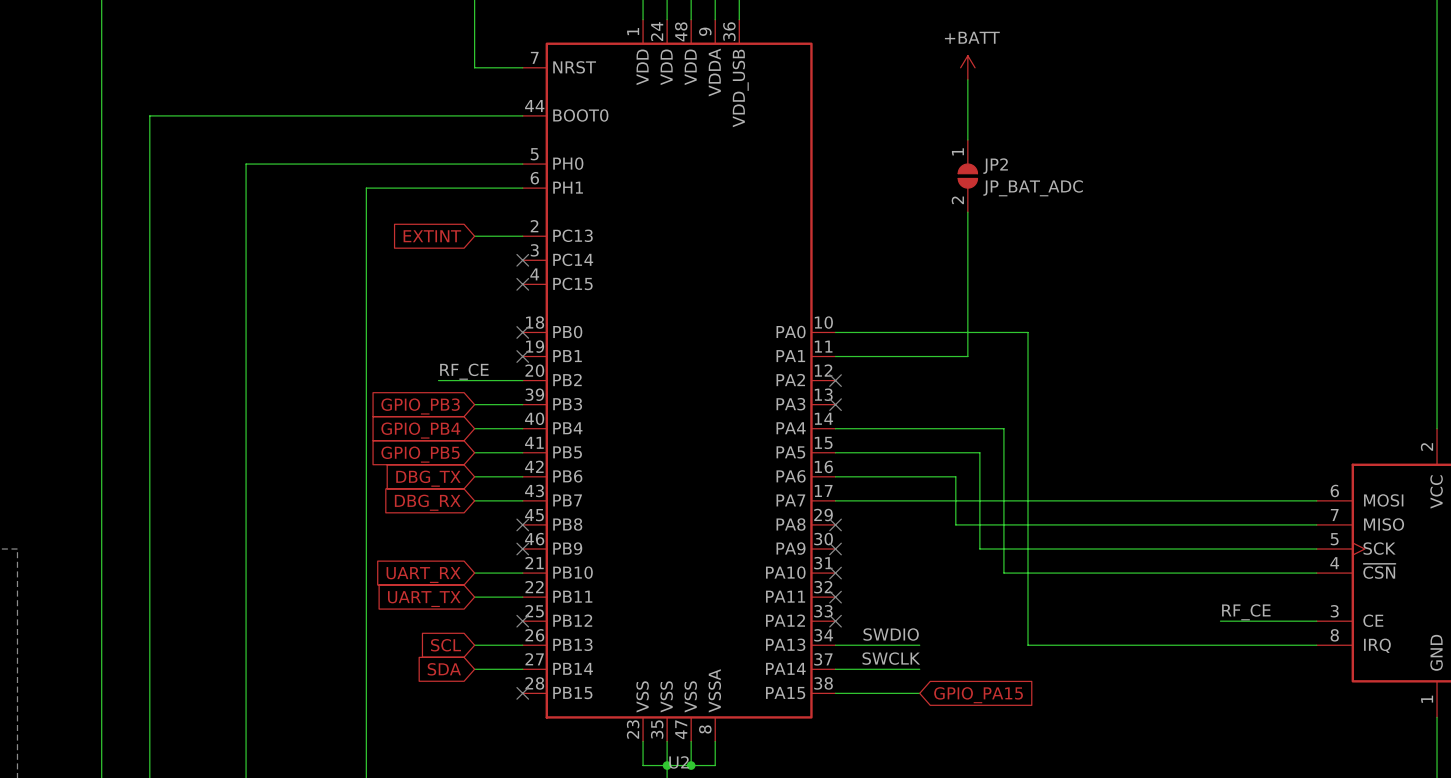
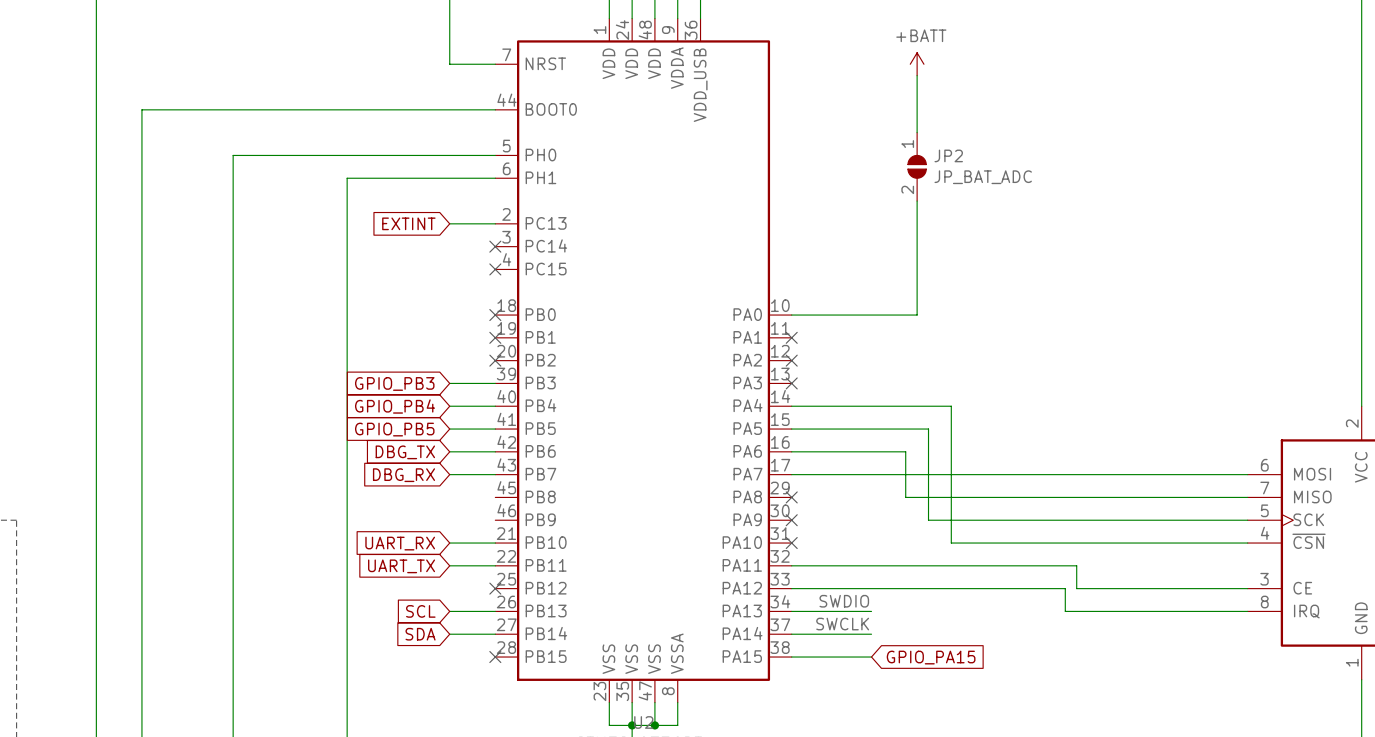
wire: (835, 356) (967, 356) (967, 332) (1028, 332) (1028, 645) (1124, 645) -> (791, 588) (1065, 588) (1065, 611)
no-connect mark: none -> (791, 337)
label: RF_CE (464, 371) -> none
wire: (438, 380) (522, 380) -> none
no-connect mark: none -> (495, 360)
no-connect mark: (522, 524) -> none
no-connect mark: (522, 549) -> none
wire: none -> (791, 565) (1076, 565) (1076, 588) (1156, 588)
no-connect mark: (835, 597) -> none
label: RF_CE (1246, 612) -> none
no-connect mark: (835, 621) -> none

